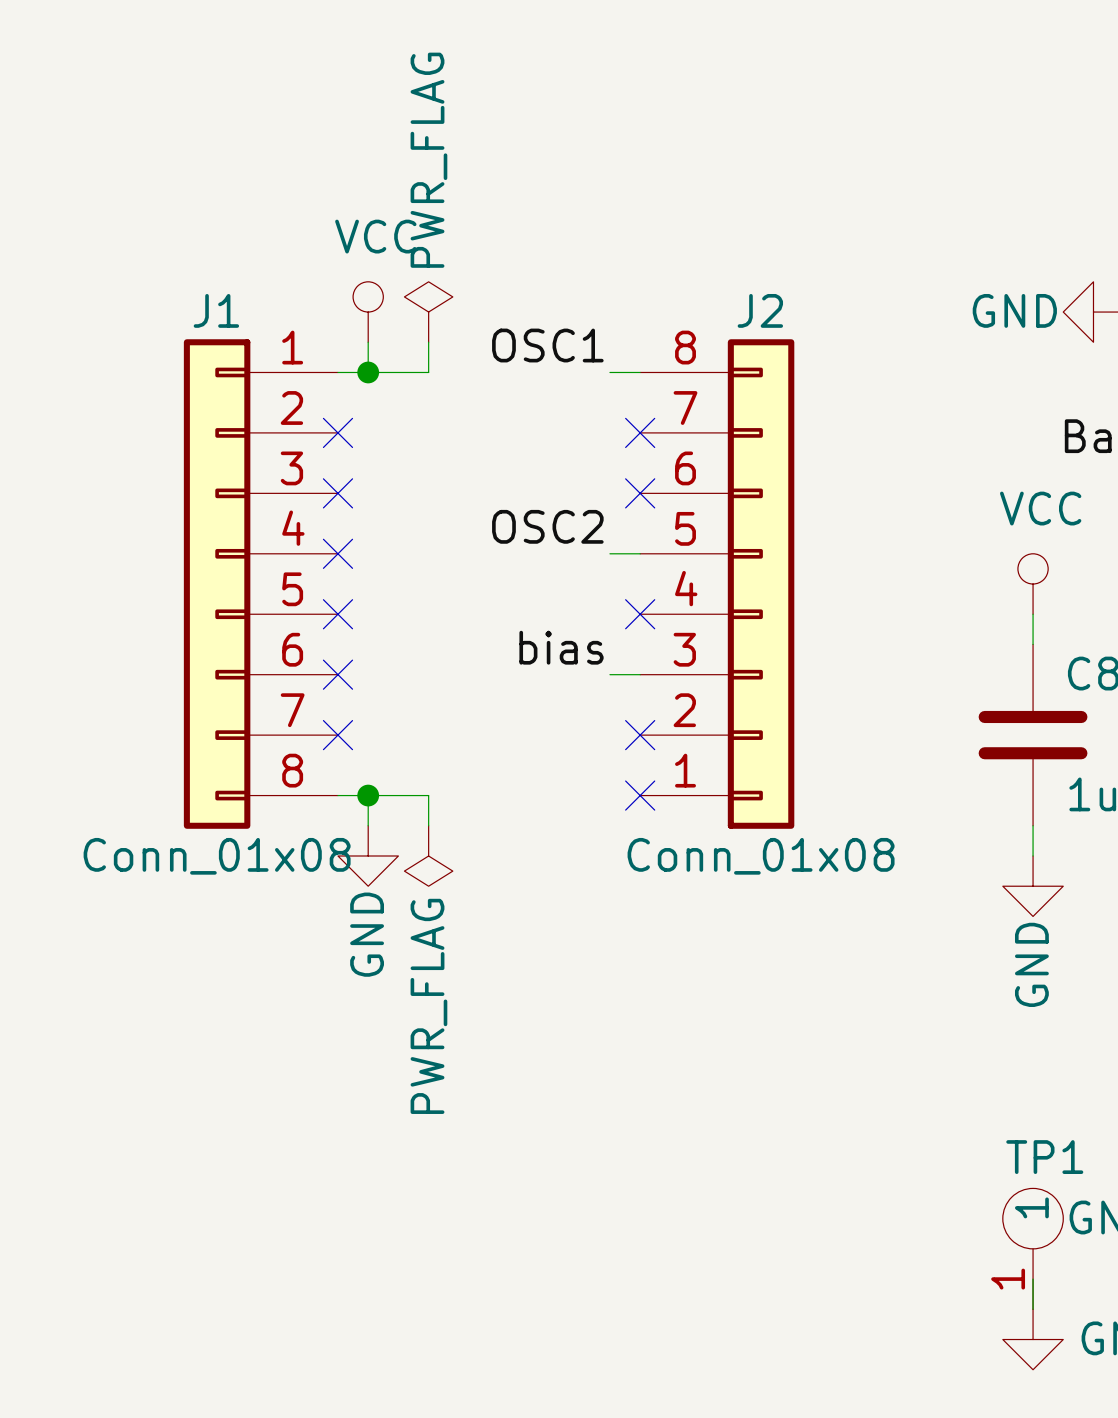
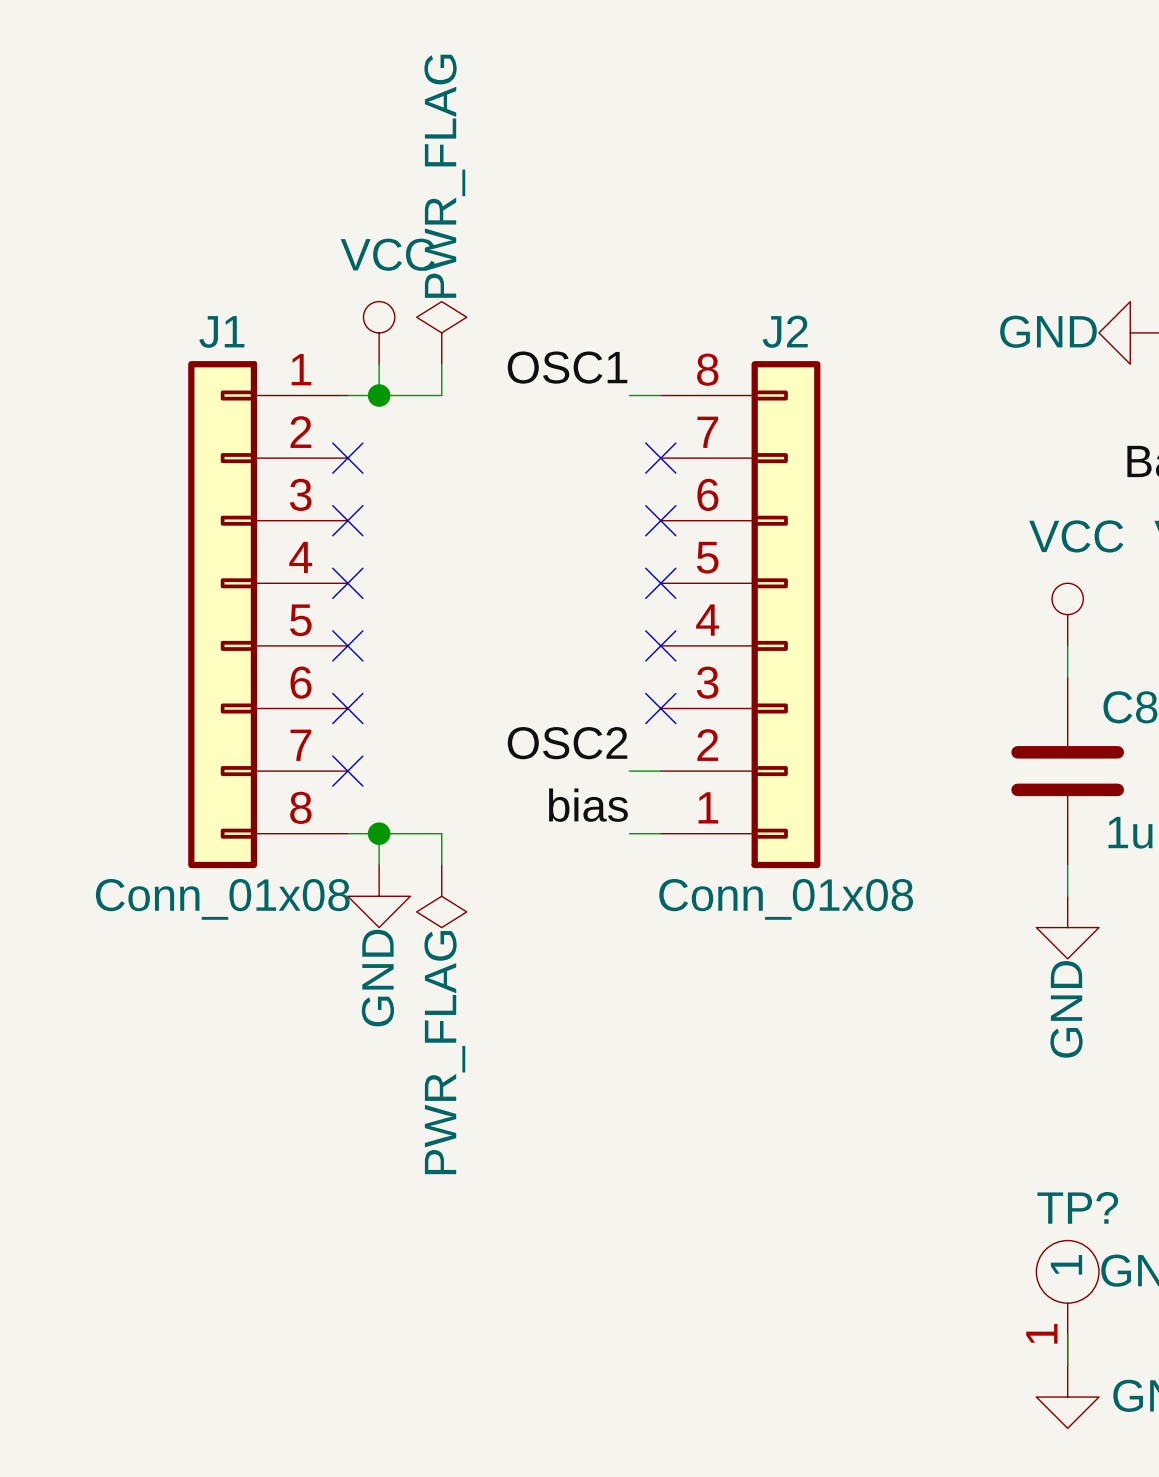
label position: OSC2 (547, 526) -> OSC2 (567, 743)
wire: (609, 553) (640, 553) -> (629, 833) (660, 833)
no-connect mark: none -> (660, 583)
label position: bias (561, 647) -> bias (588, 805)
wire: (609, 674) (640, 674) -> (629, 771) (660, 771)
no-connect mark: none -> (660, 708)
no-connect mark: (640, 735) -> none
no-connect mark: (640, 795) -> none
TP1 name: TP1 (1044, 1157) -> TP? (1077, 1207)

